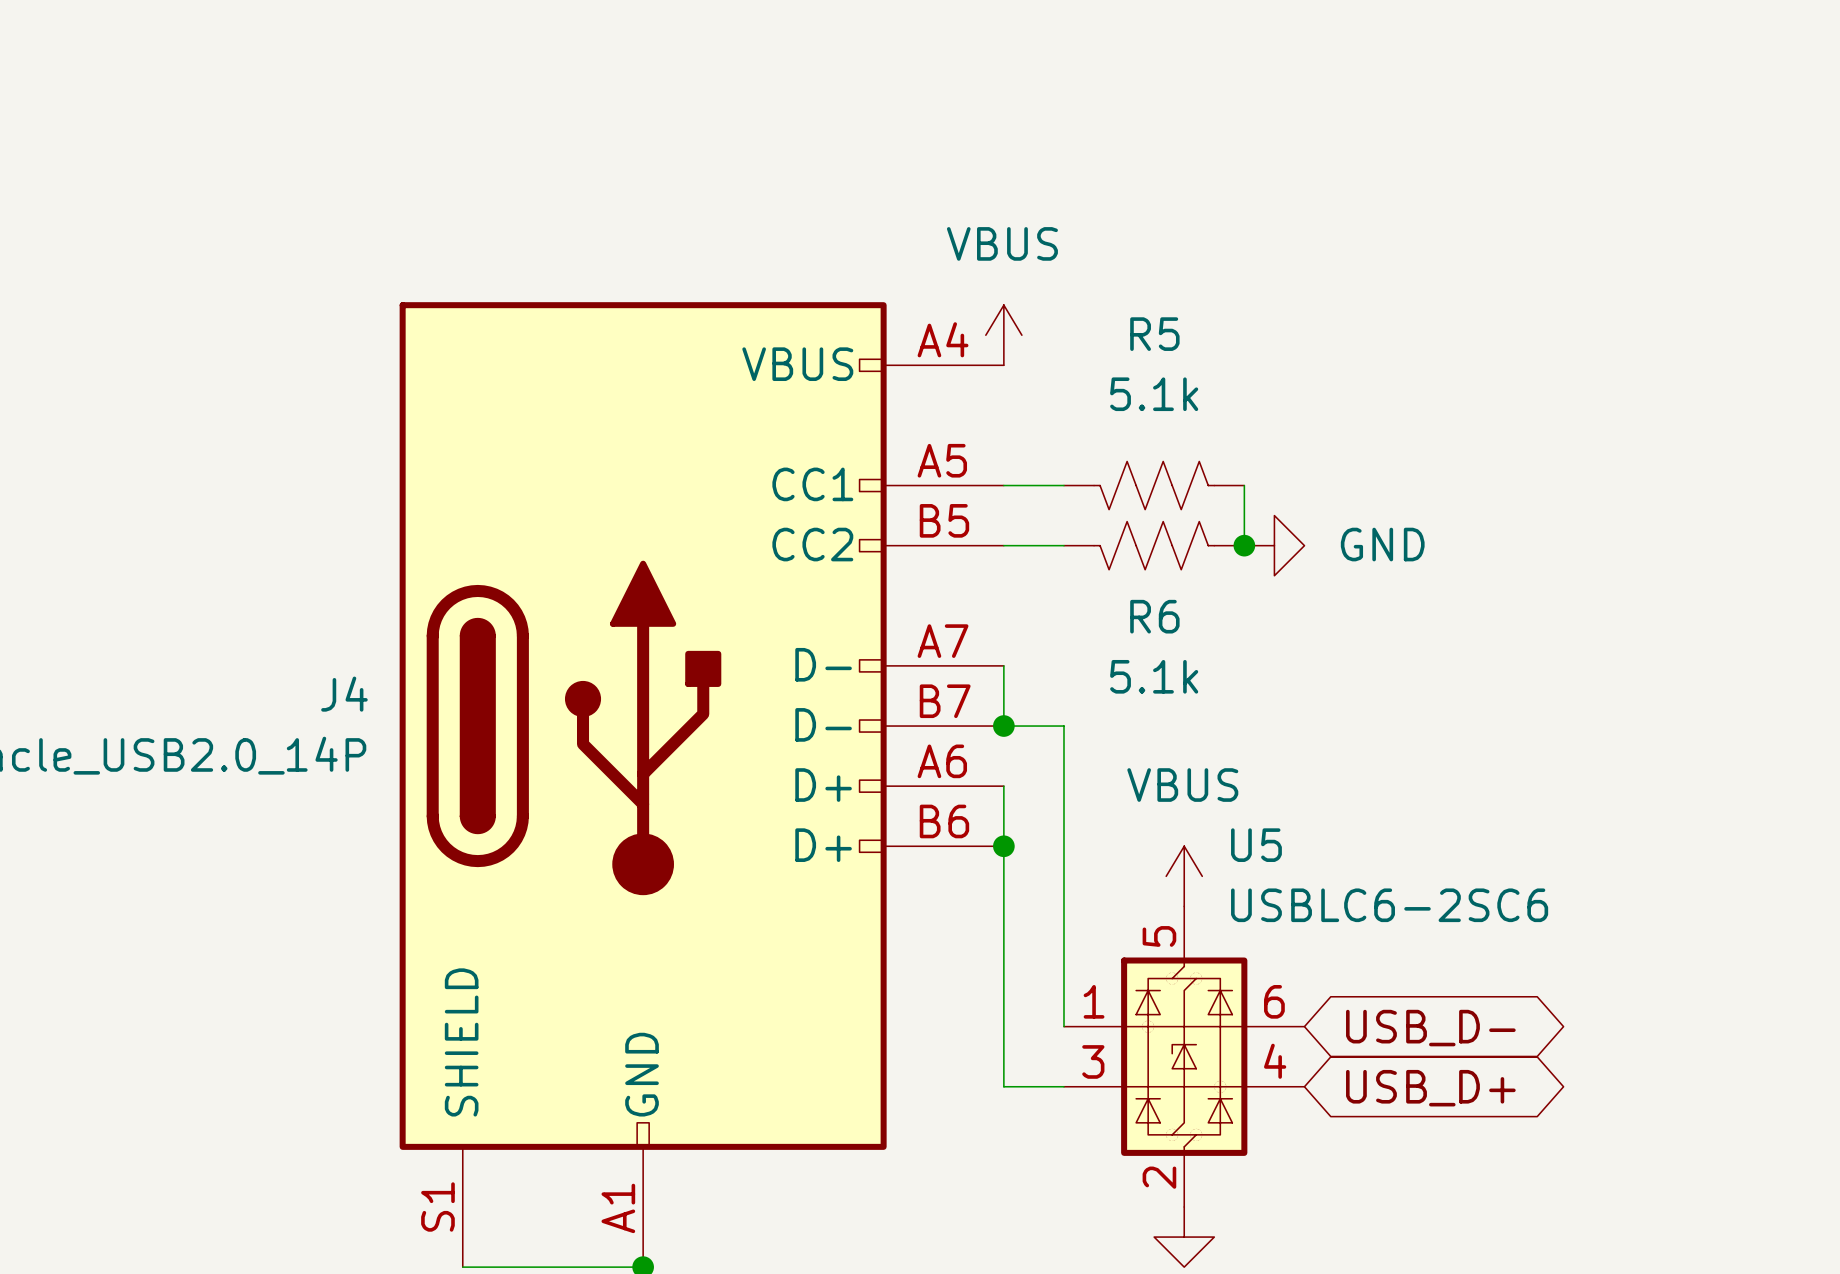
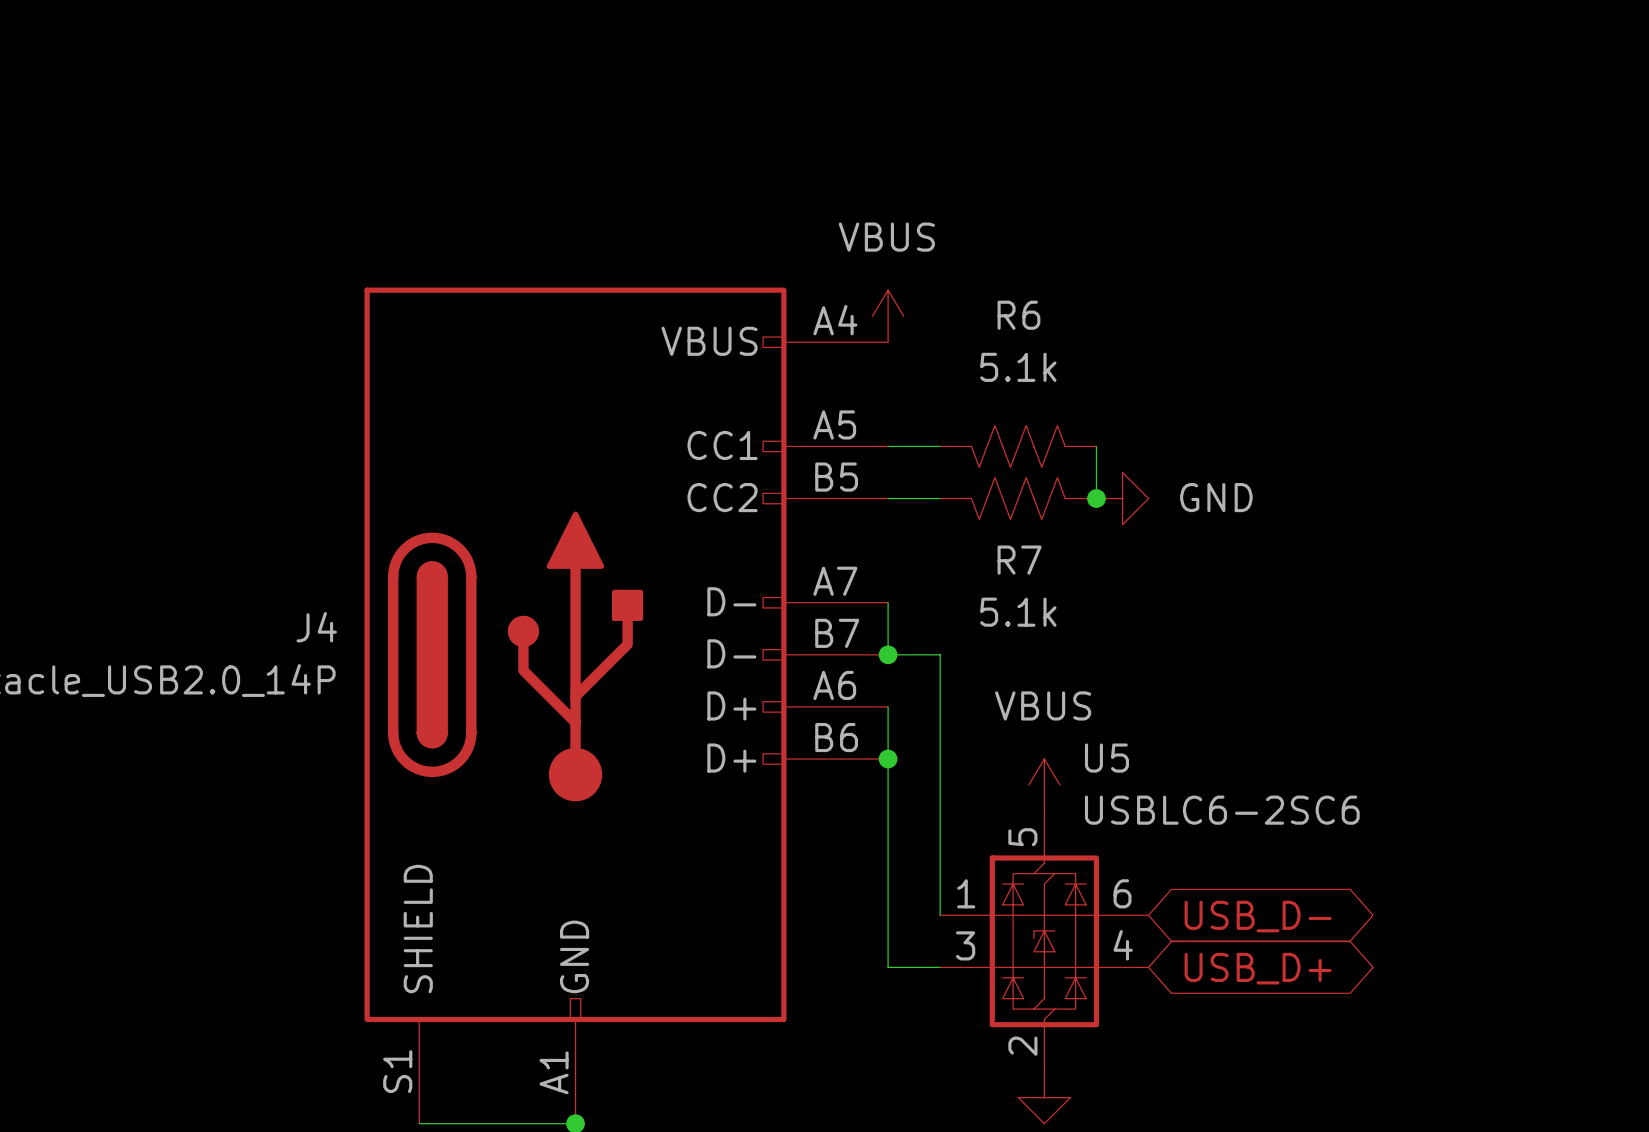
R5 name: R5 (1154, 334) -> R6 (1018, 315)
R6 name: R6 (1154, 616) -> R7 (1019, 560)

